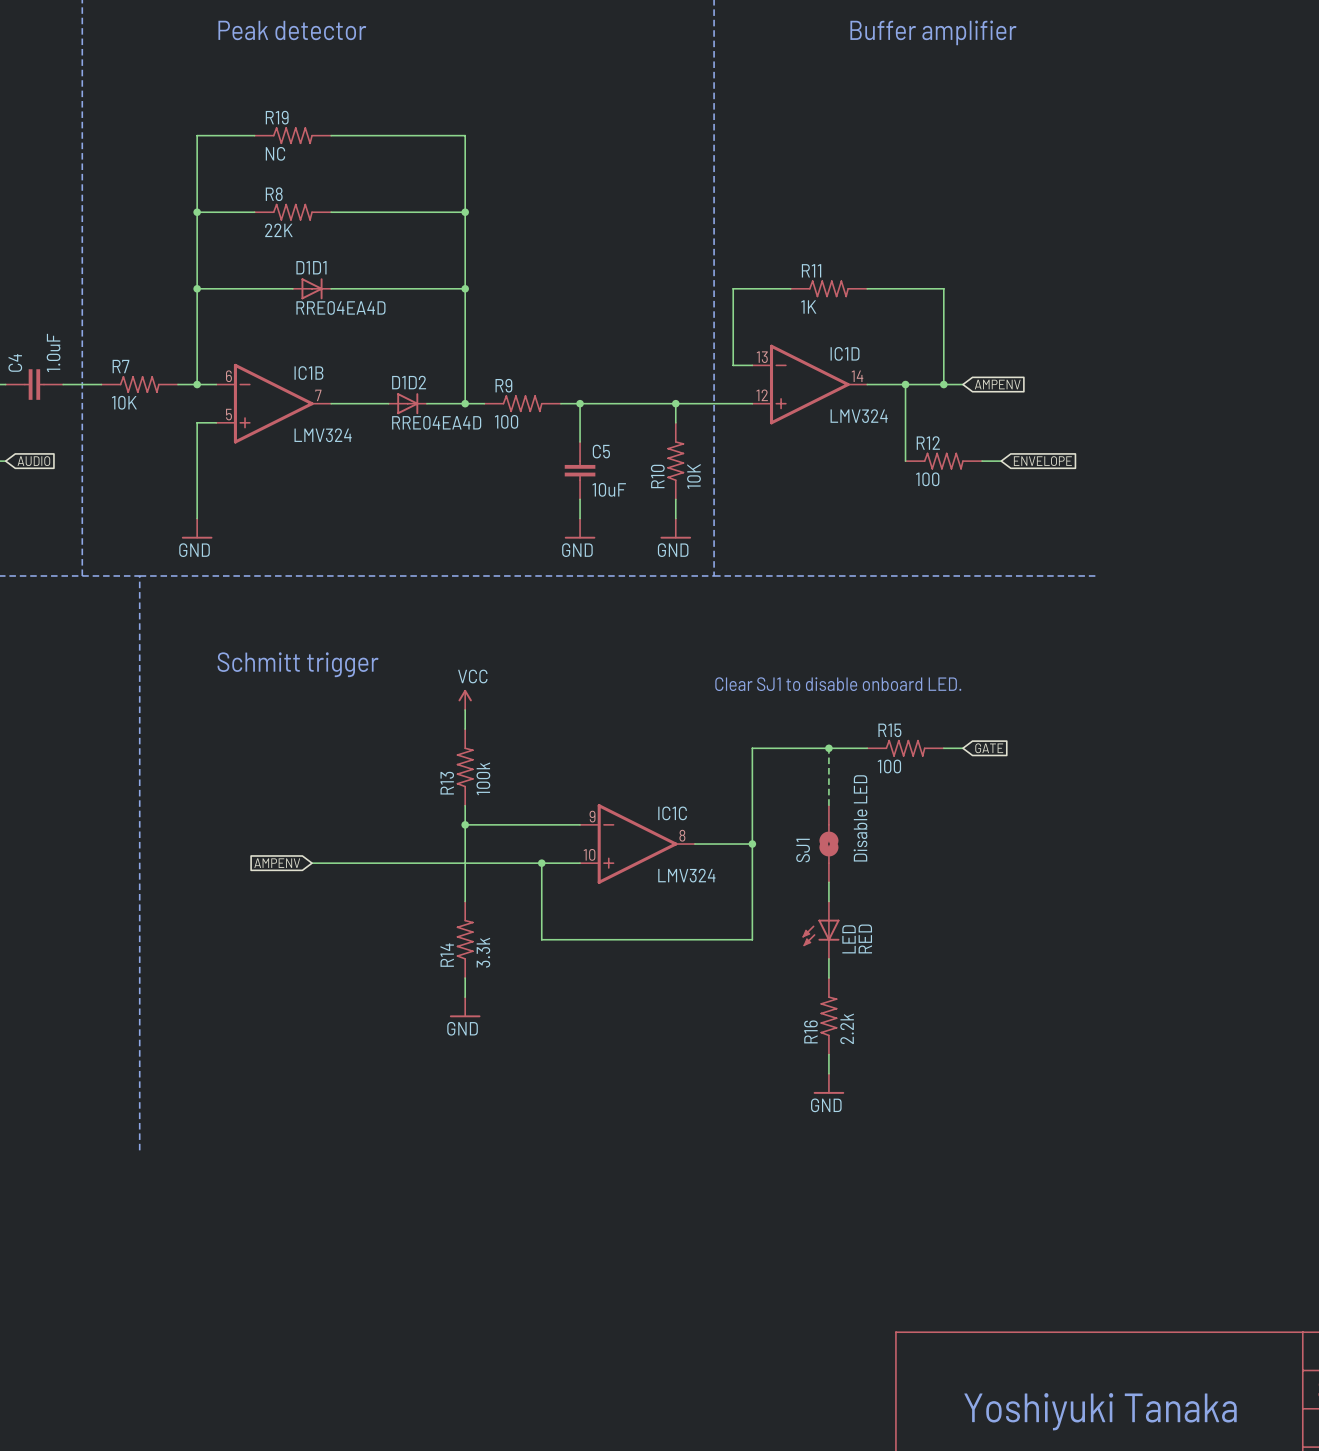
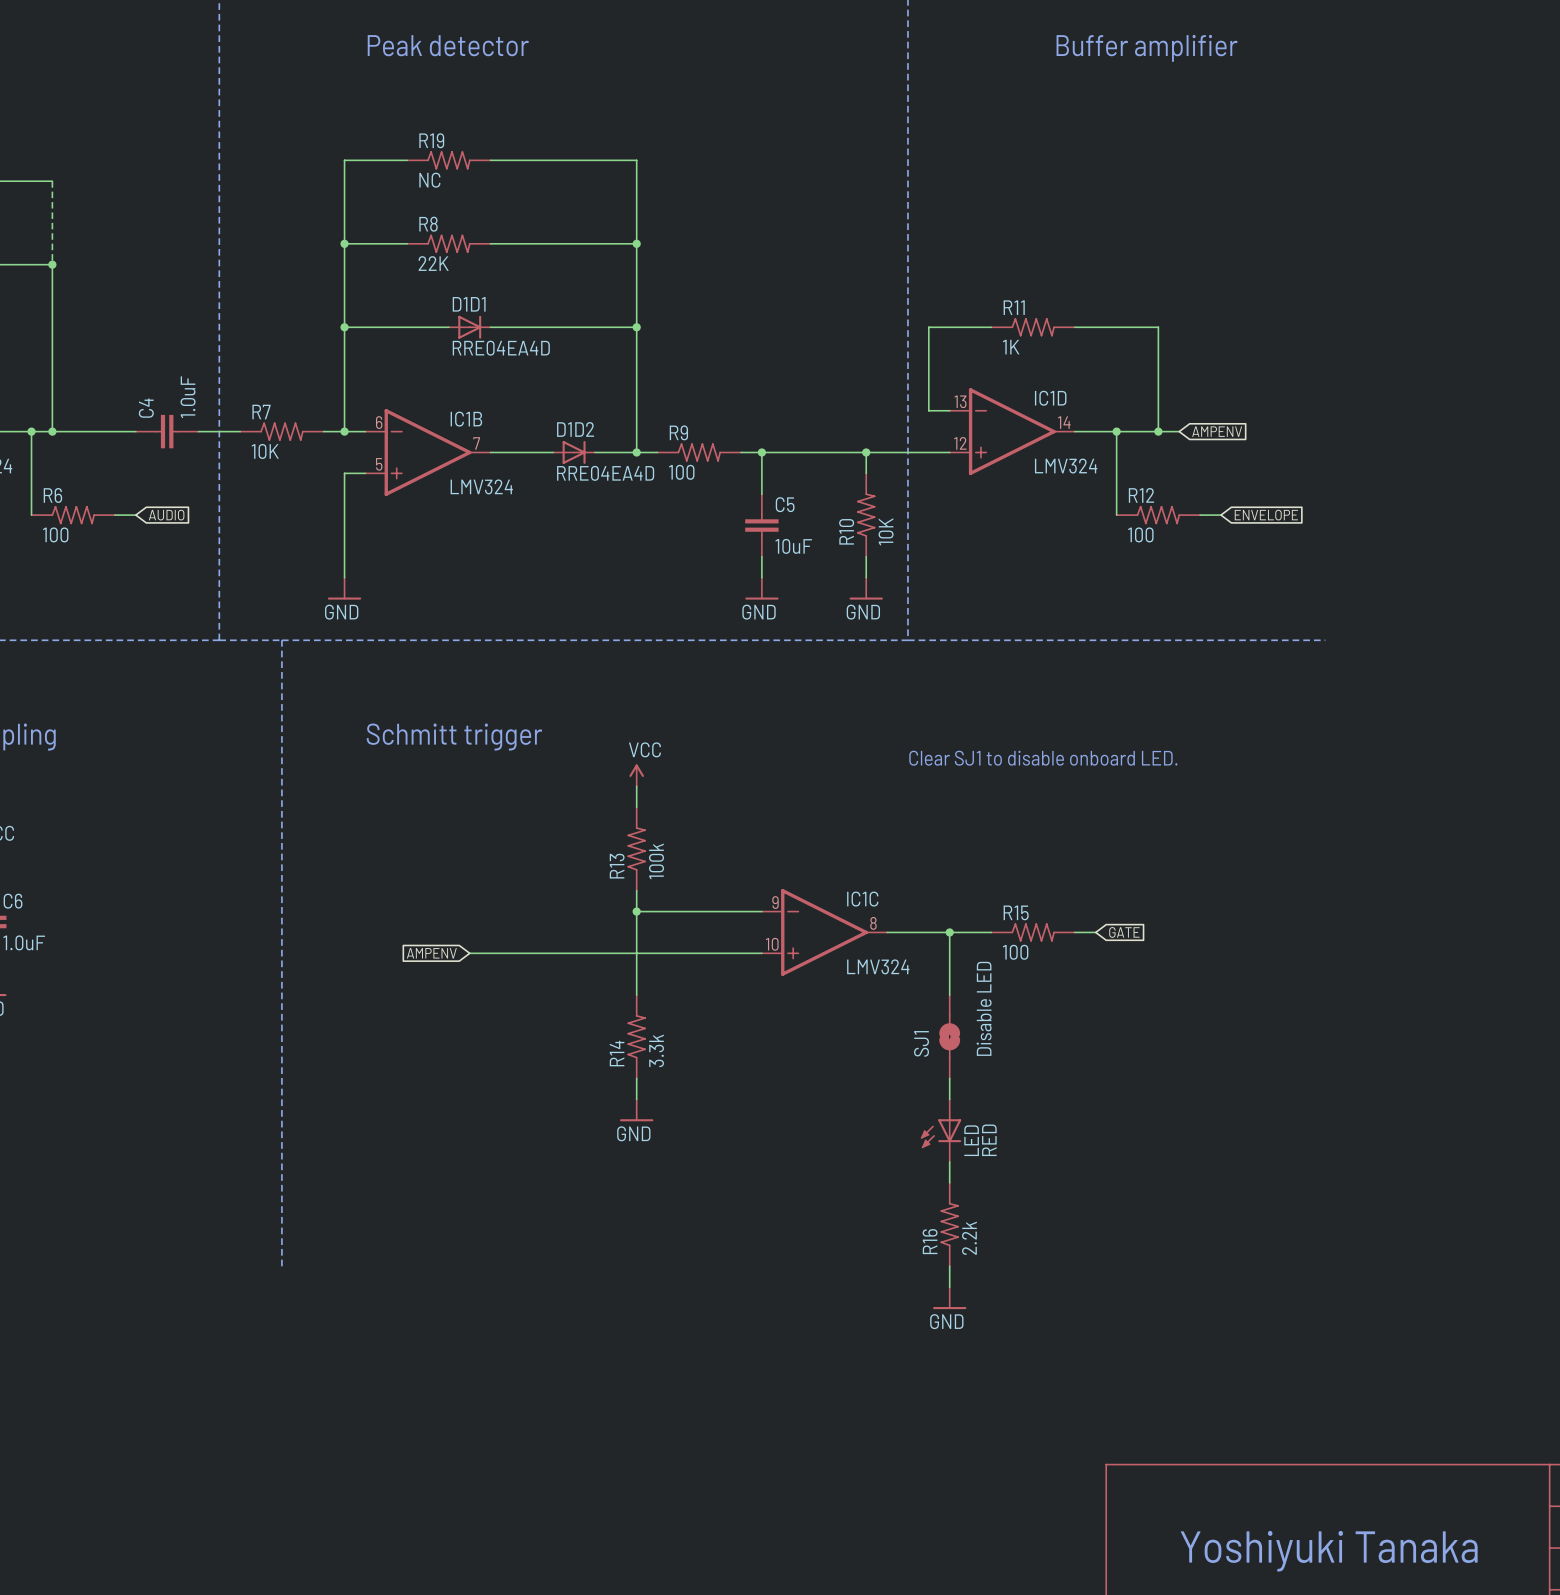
wire: (828, 748) (828, 805) -> none
junction: (828, 748) -> none
wire: (867, 748) (752, 748) (752, 844) -> (991, 932) (949, 932)
R15 position: (905, 748) -> (1033, 932)
wire: (943, 748) (962, 748) -> (1074, 932) (1095, 932)
global label position: GATE (989, 748) -> GATE (1124, 932)
SJ1 position: (828, 844) -> (949, 1036)
wire: (541, 863) (541, 939) (752, 939) (752, 901) -> none
junction: (541, 863) -> none
wire: (828, 882) (828, 901) -> (949, 1078) (949, 1099)
LED position: (820, 930) -> (941, 1130)
wire: (828, 958) (828, 978) -> (949, 1161) (949, 1182)
R16 position: (828, 1016) -> (949, 1224)
wire: (828, 1054) (828, 1073) -> (949, 1266) (949, 1287)
power symbol position: GND (828, 1083) -> GND (949, 1298)

